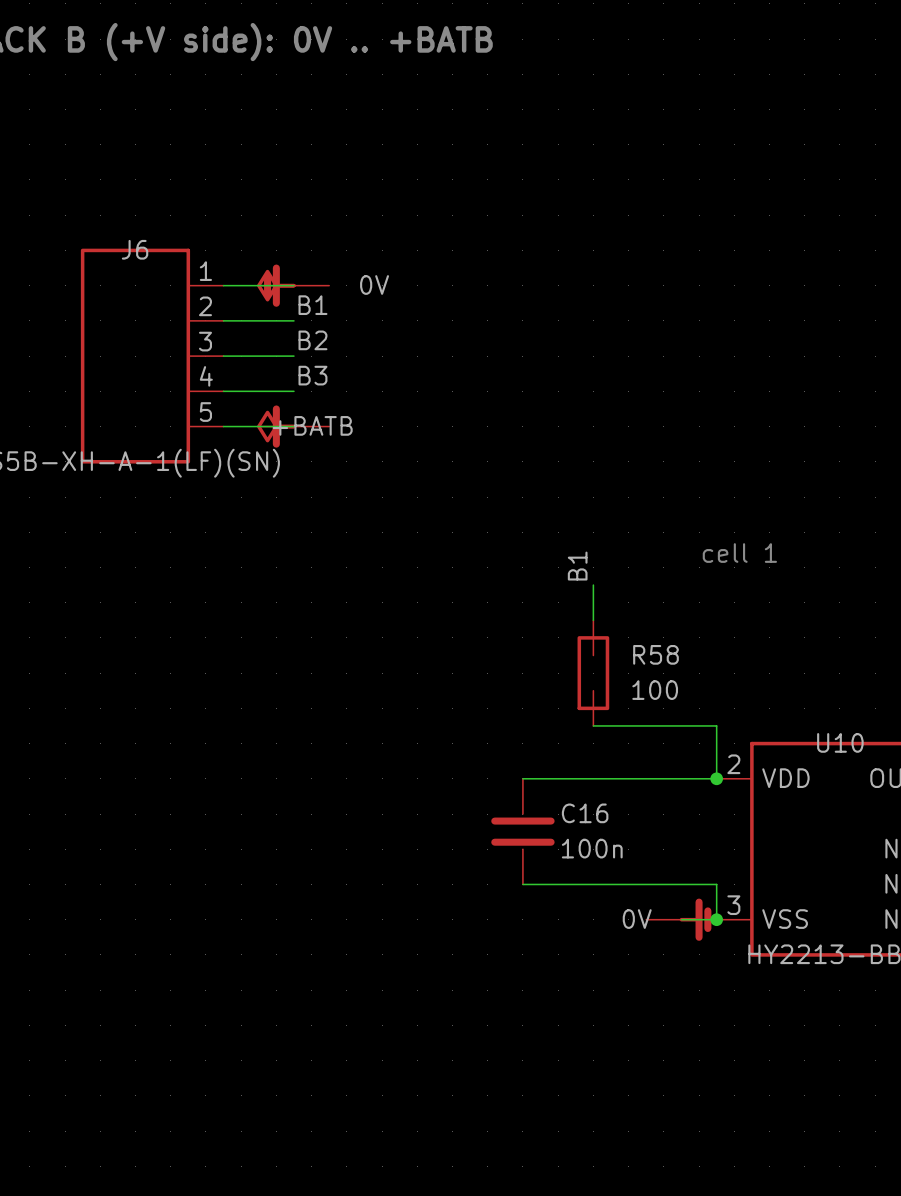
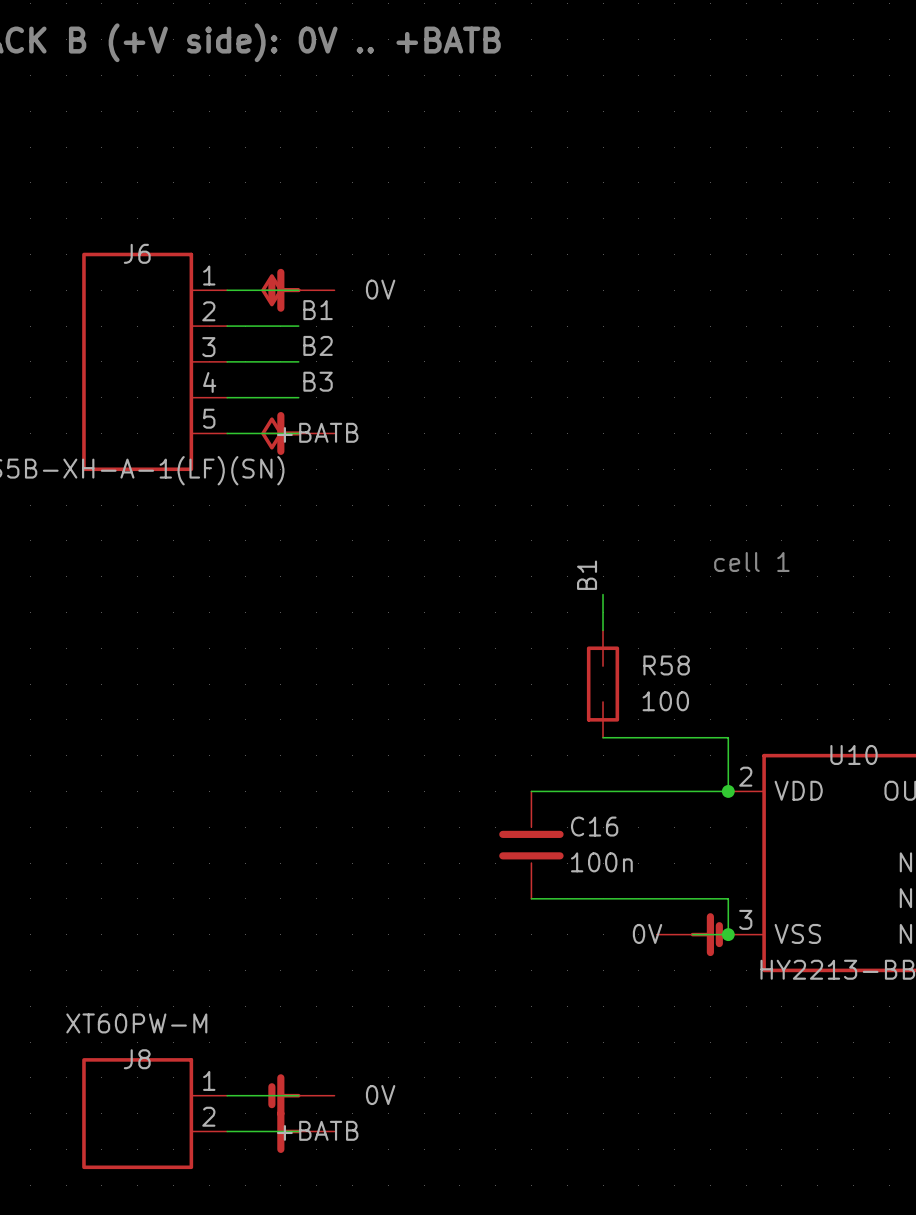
wire: none -> (227, 1095) (298, 1095)
power symbol: none -> 0V (301, 1095)
J8: none -> XT60PW-M (154, 1113)
wire: none -> (227, 1131) (298, 1131)
power symbol: none -> +BATB (305, 1131)

